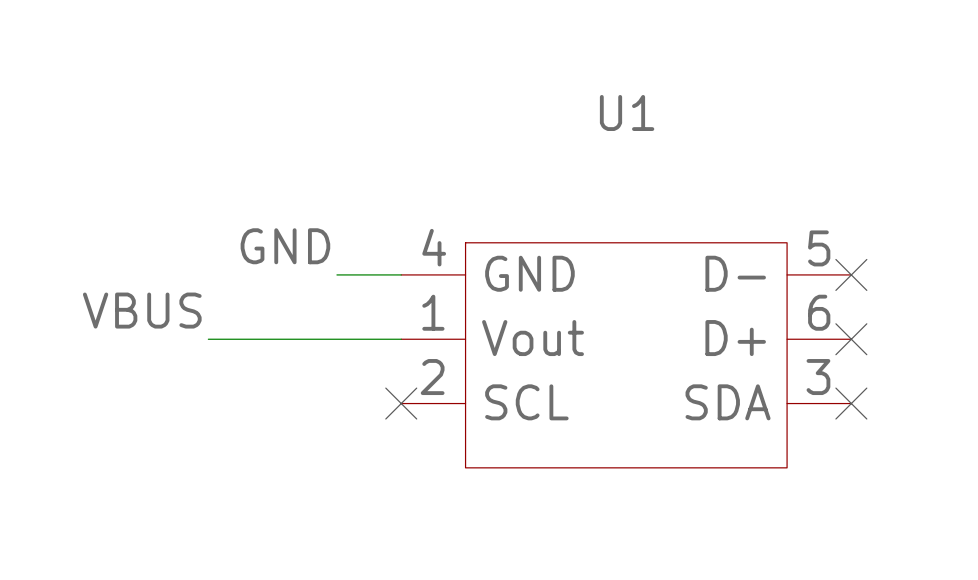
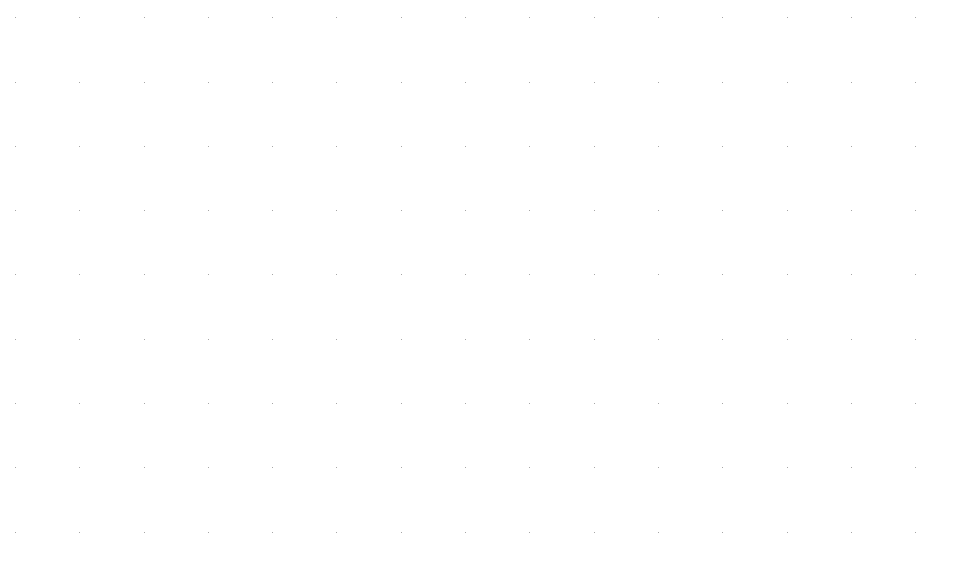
label: GND (285, 246) -> none
wire: (336, 274) (401, 274) -> none
no-connect mark: (851, 274) -> none
label: VBUS (142, 310) -> none
wire: (208, 339) (401, 339) -> none
no-connect mark: (851, 339) -> none
U1: (626, 355) -> none
no-connect mark: (401, 403) -> none
no-connect mark: (851, 403) -> none

